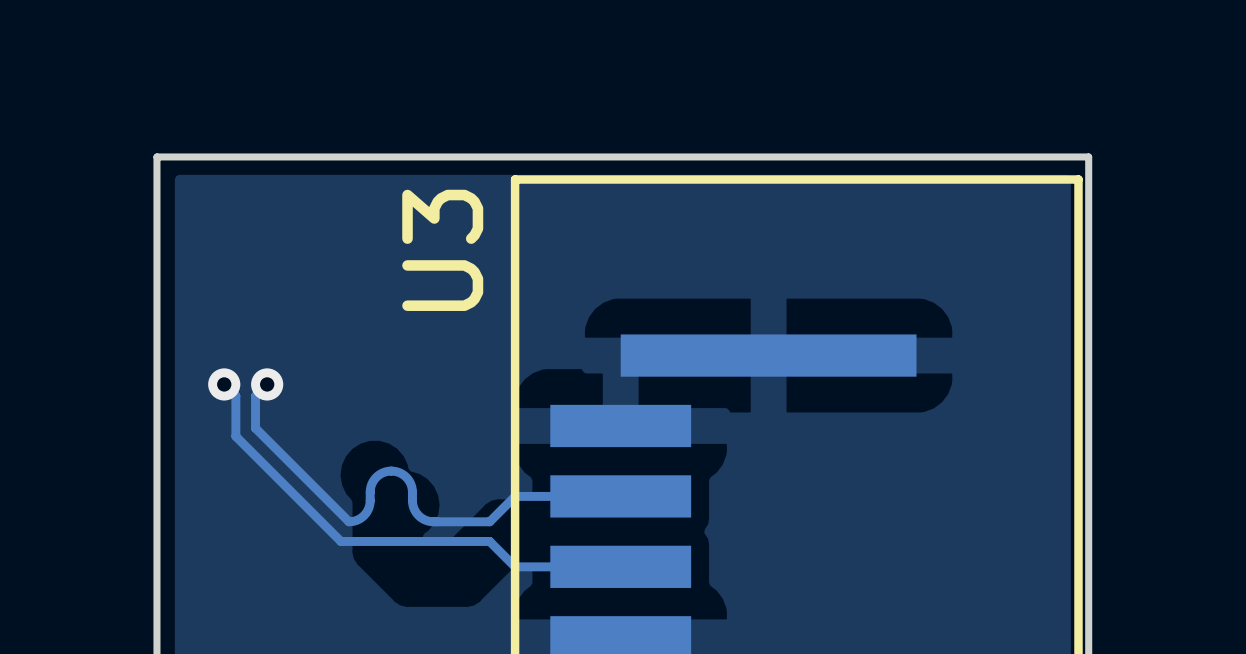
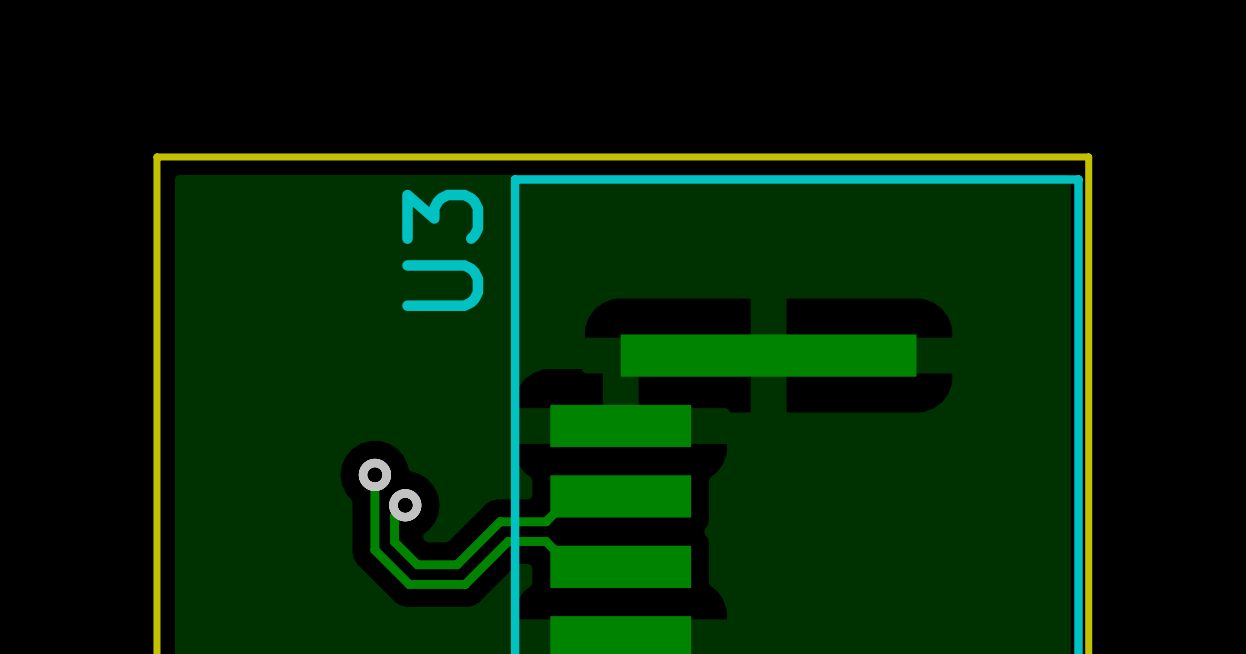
track: (224, 384) (235, 396) (235, 436) (340, 541) (489, 541) (515, 566) (571, 566) -> (374, 474) (374, 550) (409, 584) (465, 584) (508, 541) (546, 541) (571, 566)
via: (224, 384) -> none
track: (267, 384) (255, 396) (255, 428) (349, 521) (357, 520) (365, 513) (369, 506) (370, 489) (373, 481) (380, 473) (388, 471) (399, 472) (408, 479) (411, 486) (412, 503) (415, 511) (420, 517) (430, 521) (489, 521) (515, 496) (571, 496) -> (405, 505) (394, 515) (394, 541) (417, 564) (457, 564) (500, 521) (546, 521) (571, 496)
via: (267, 384) -> none
via: none -> (374, 474)
via: none -> (405, 505)

